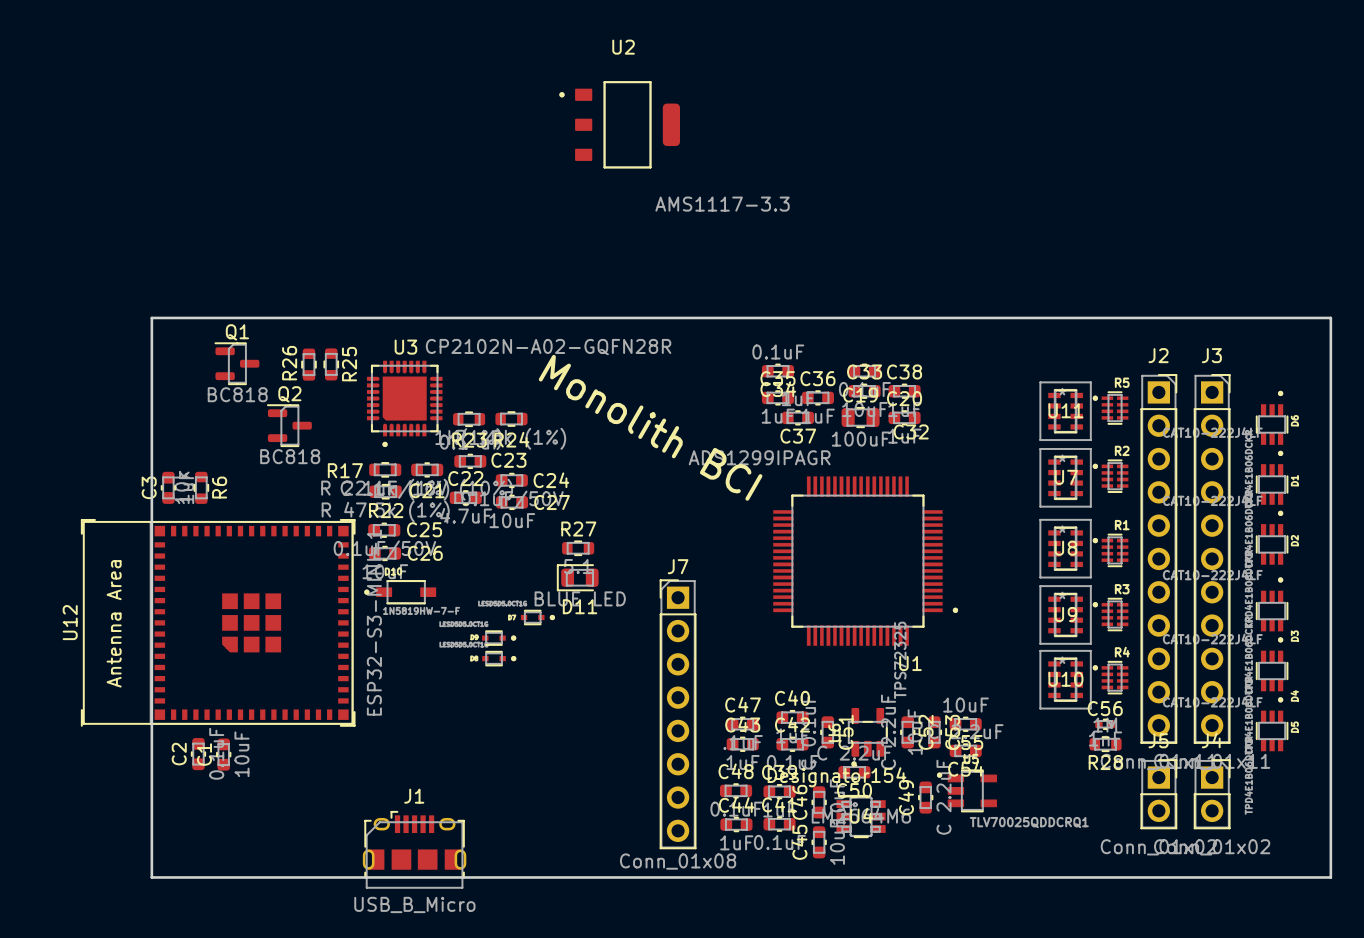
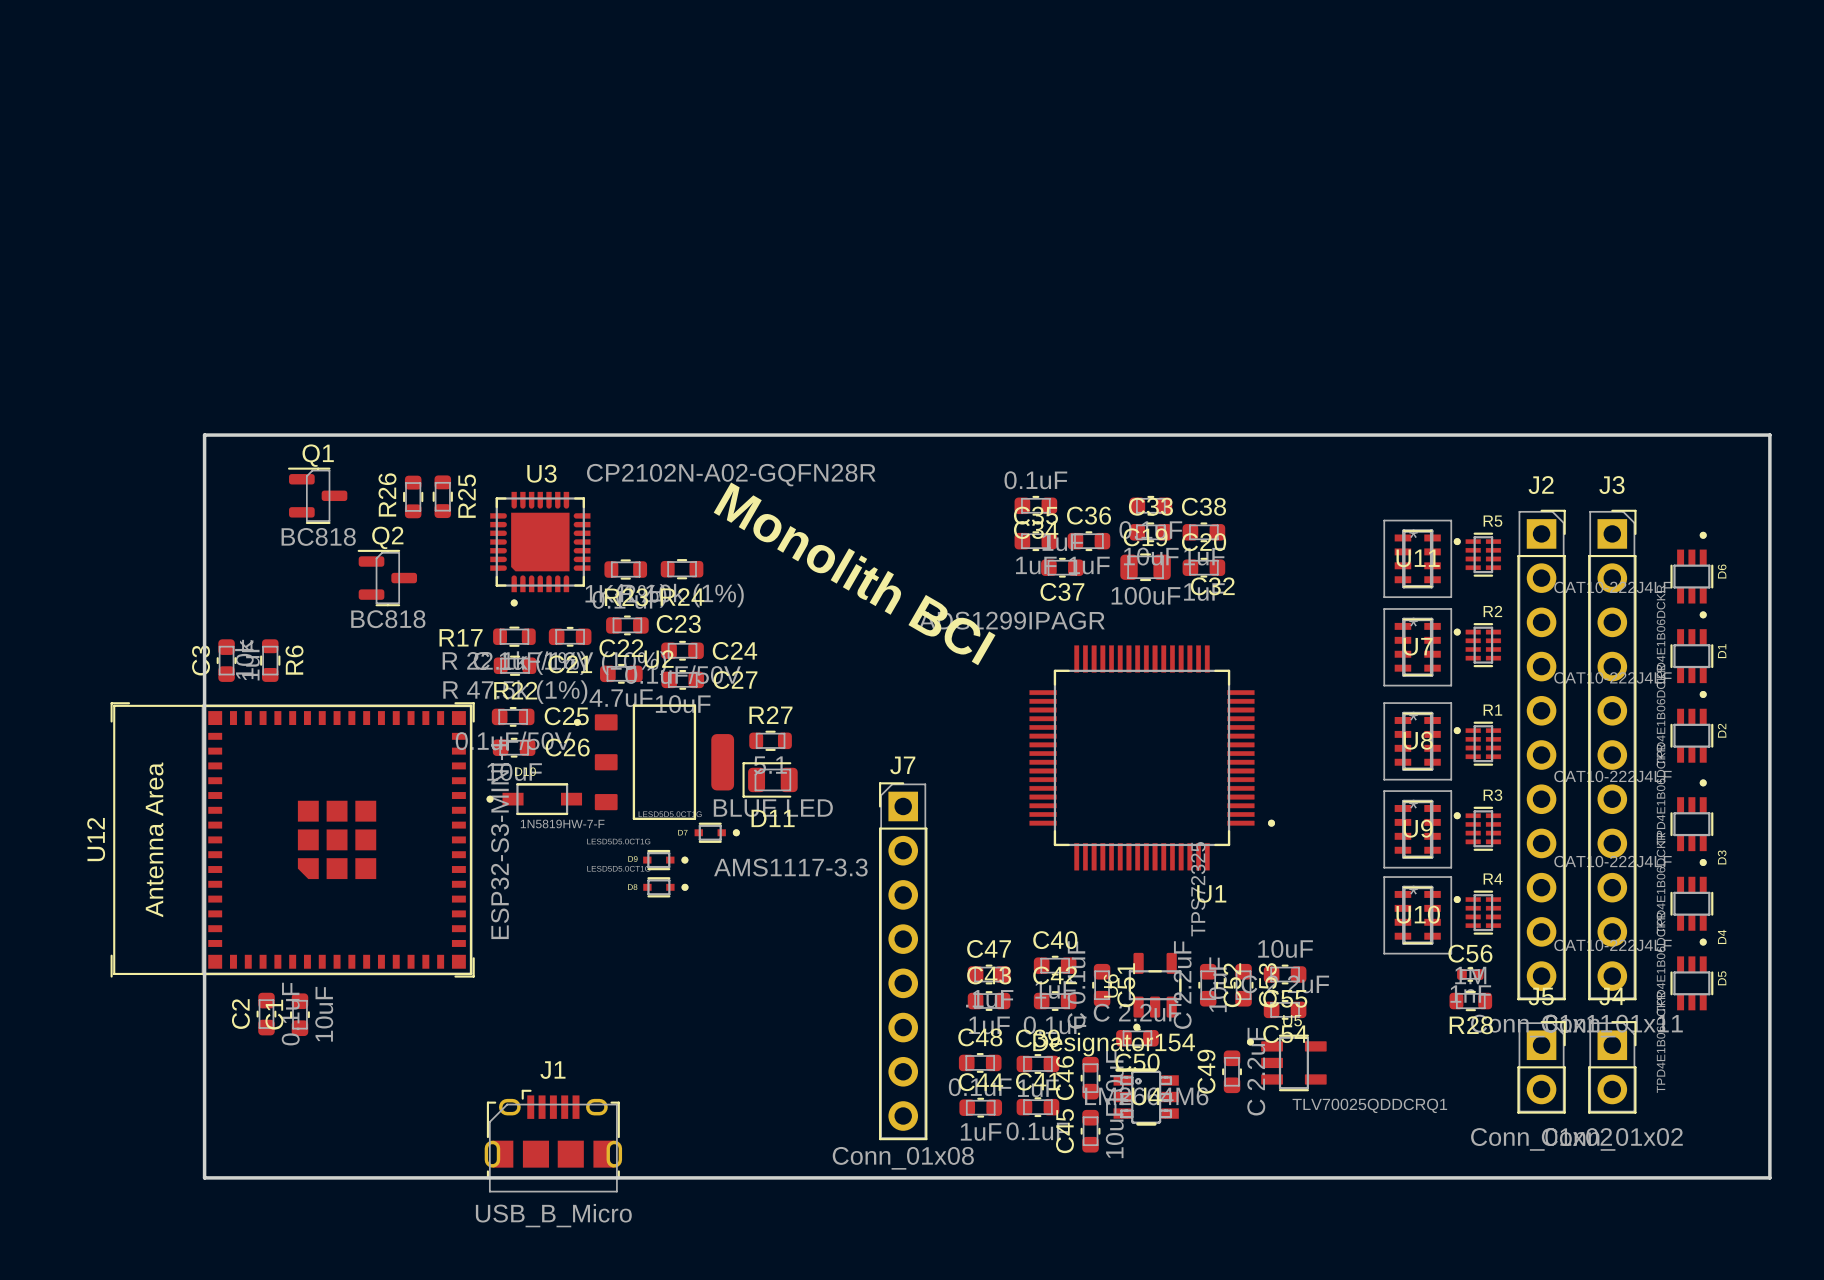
U2 position: (619, 124) -> (654, 762)

